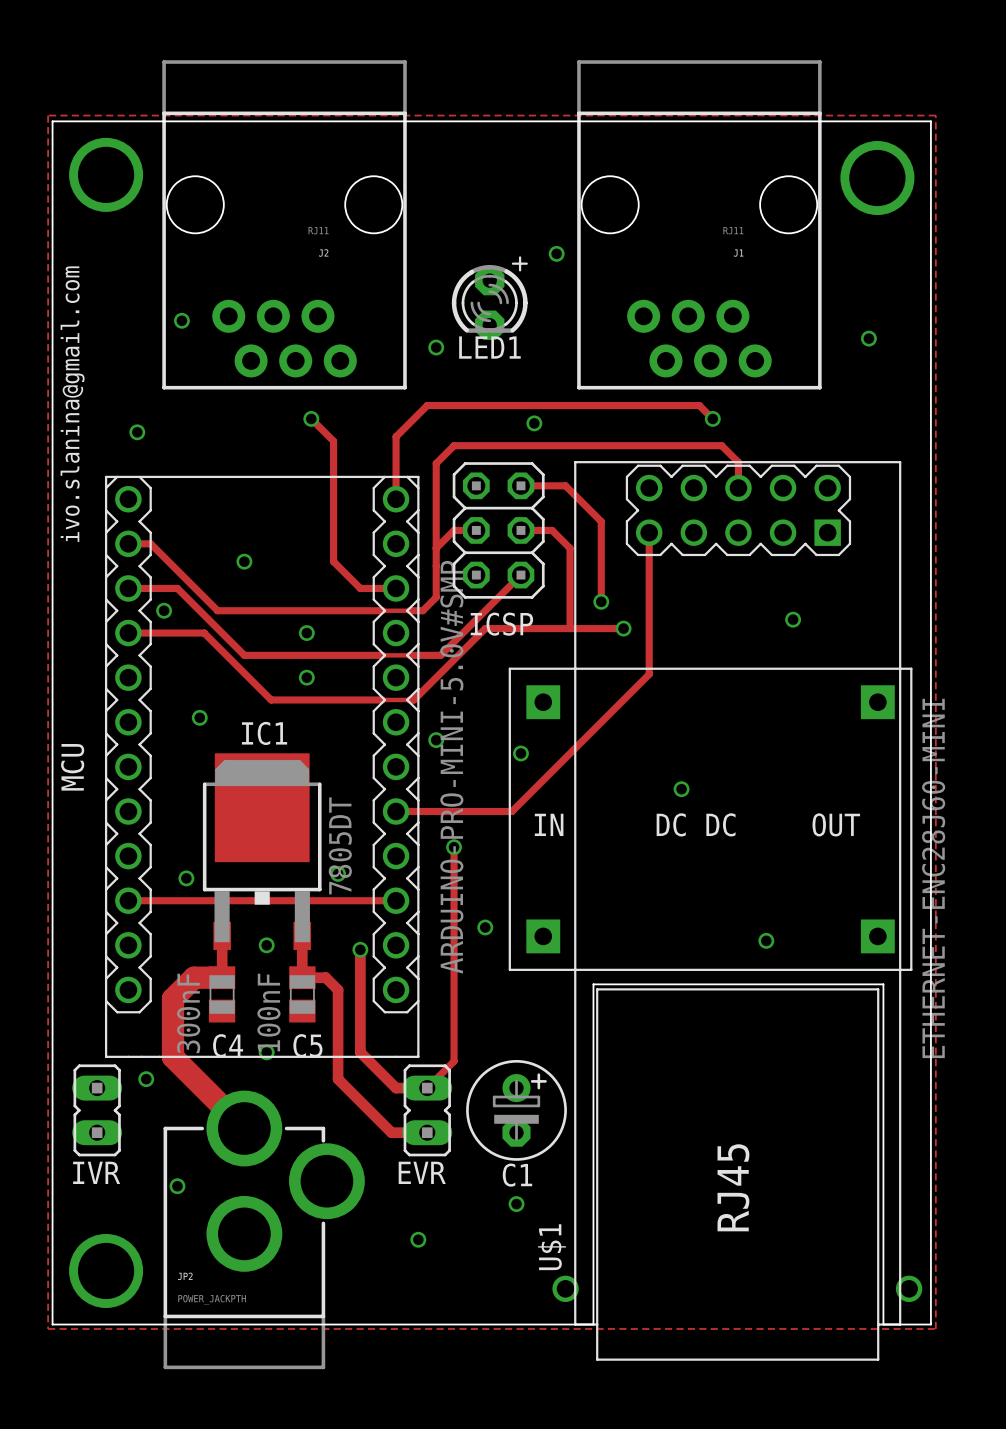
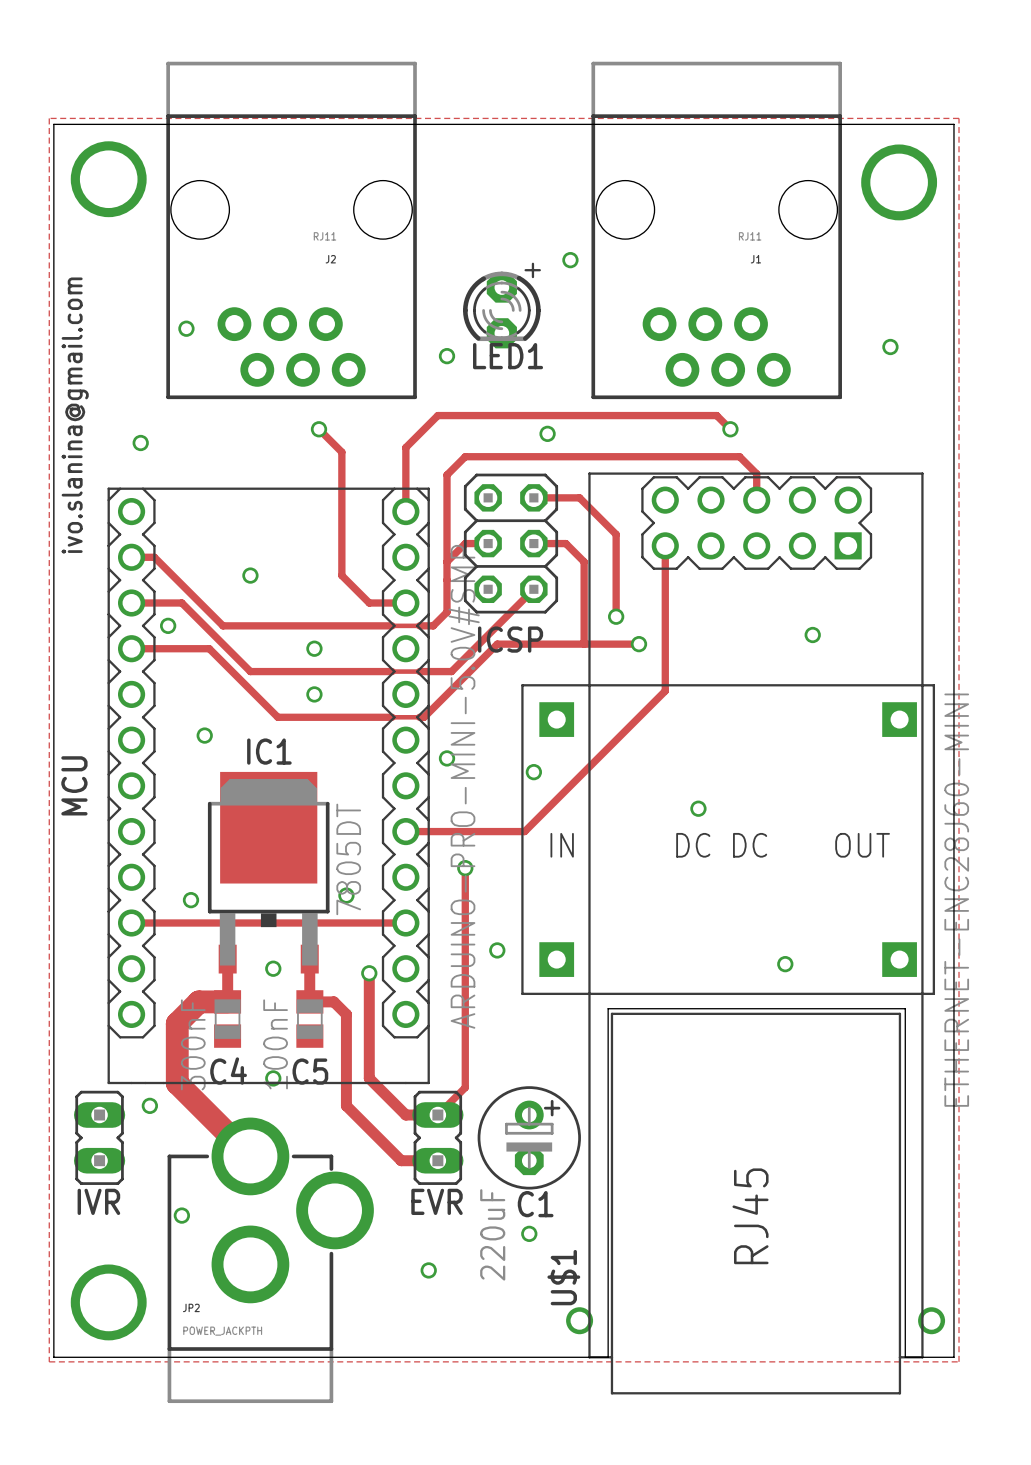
C1 value: none -> 220uF (492, 1234)

